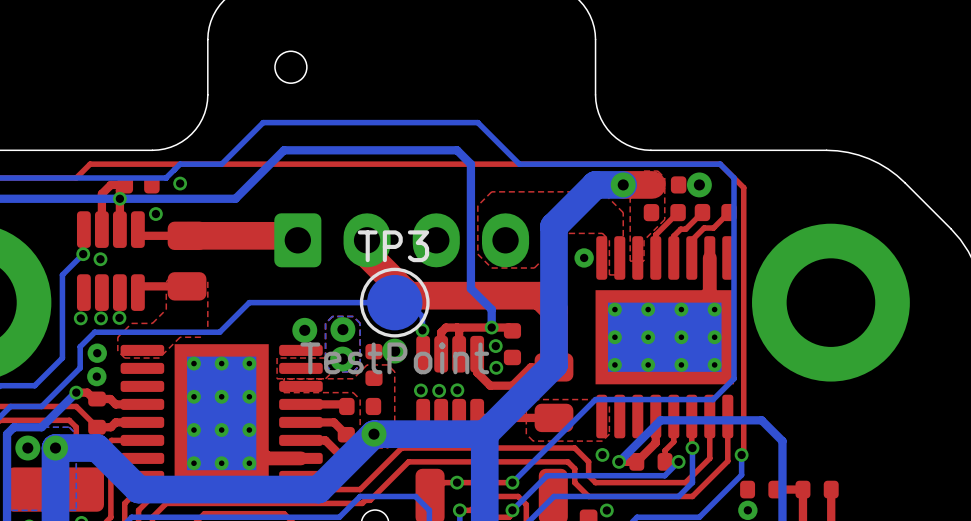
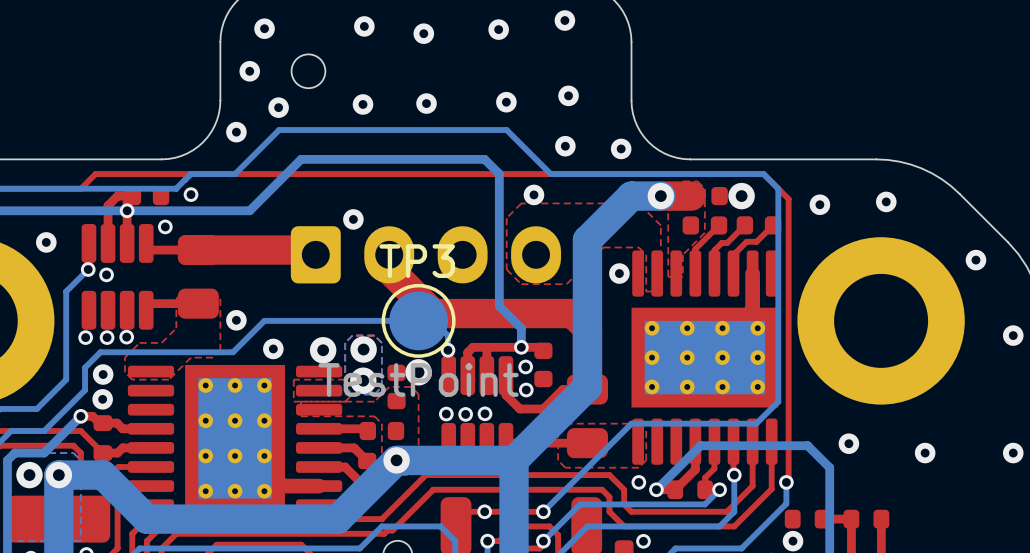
via: none -> (564, 20)
via: none -> (364, 26)
via: none -> (264, 28)
via: none -> (498, 29)
via: none -> (423, 33)
via: none -> (249, 71)
via: none -> (568, 95)
via: none -> (506, 102)
via: none -> (426, 103)
via: none -> (363, 104)
via: none -> (278, 107)
via: none -> (236, 132)
via: none -> (565, 146)
via: none -> (621, 148)
via: none -> (533, 194)
via: none -> (886, 201)
via: none -> (819, 204)
via: none -> (353, 219)
via: none -> (46, 242)
via: none -> (975, 260)
via: none -> (236, 320)
via: none -> (1013, 335)
via: none -> (273, 348)
via: none -> (848, 443)
via: none -> (925, 453)
via: none -> (1013, 453)

